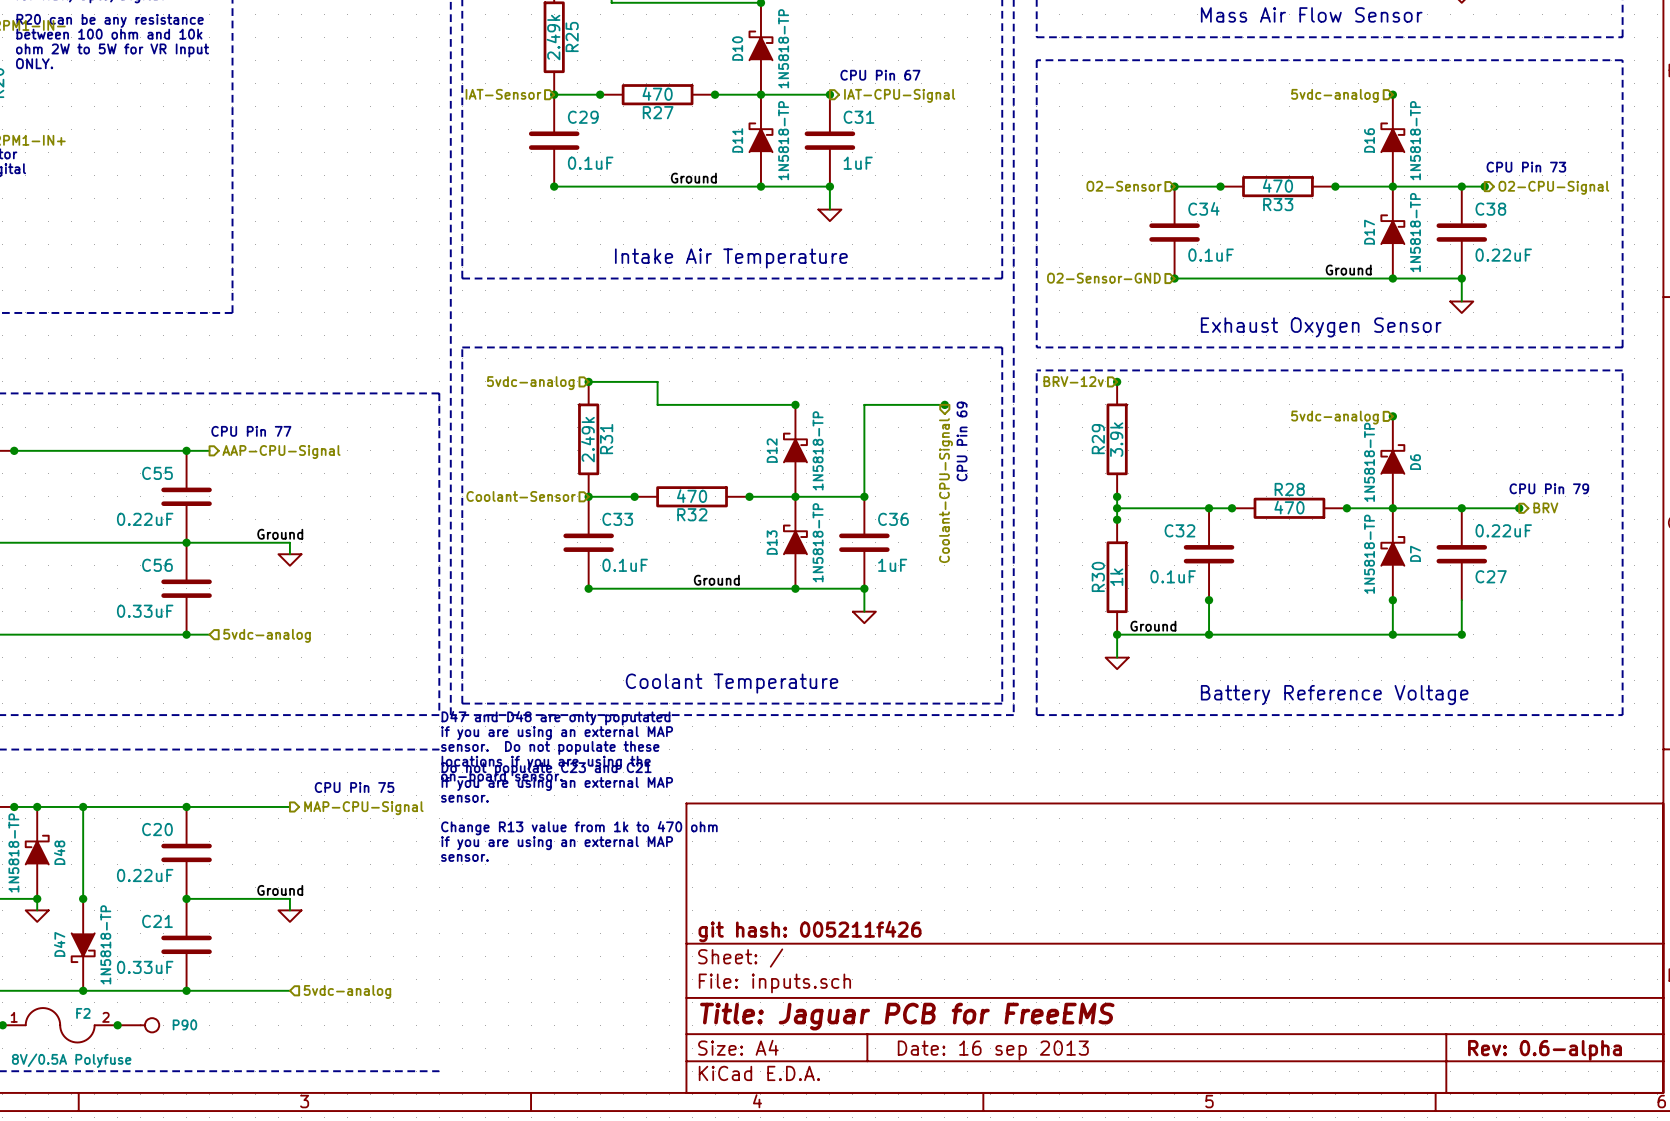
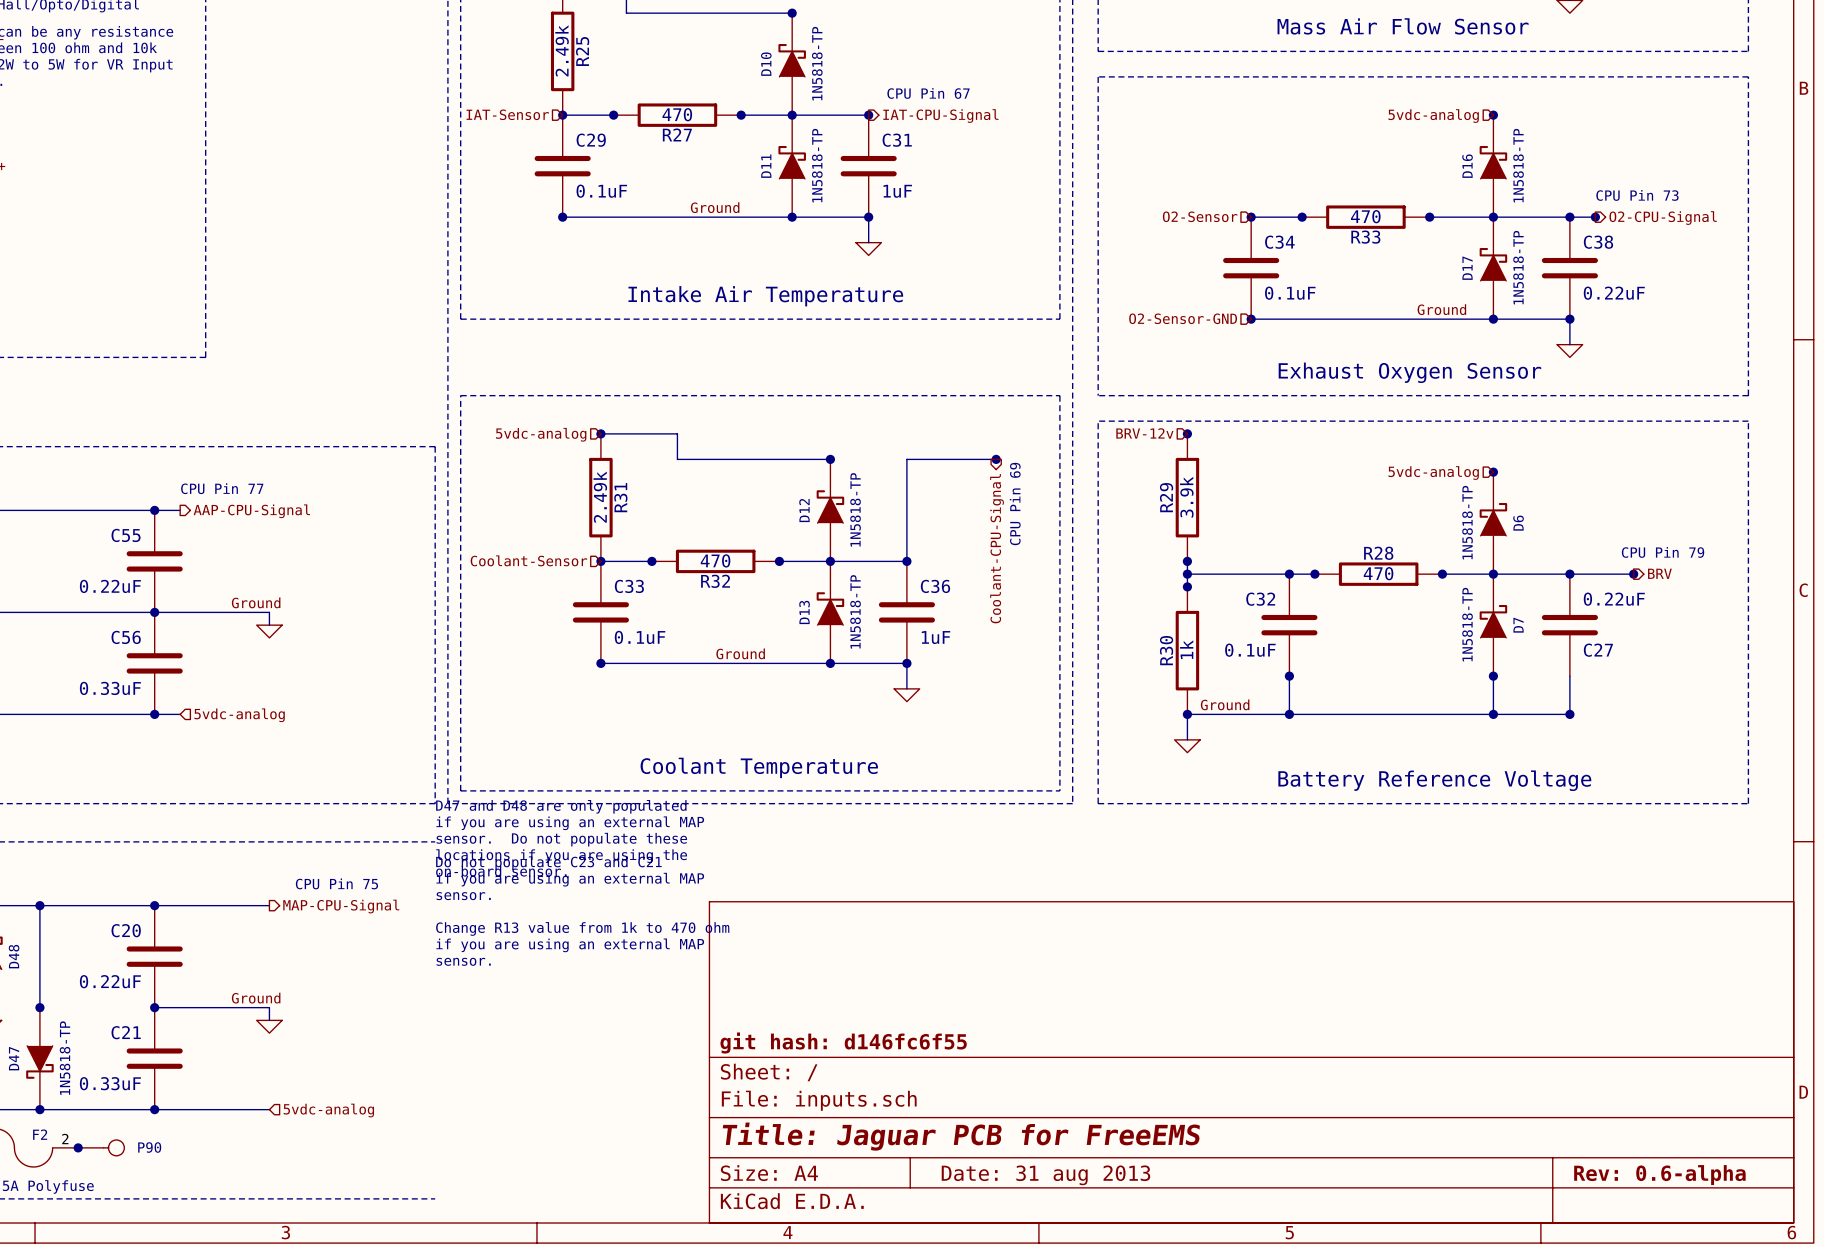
title block: git hash: 005211f426 (810, 931) -> git hash: d146fc6f55 (843, 1043)
title block: Date: 16 sep 2013 (993, 1050) -> Date: 31 aug 2013 (1045, 1175)

